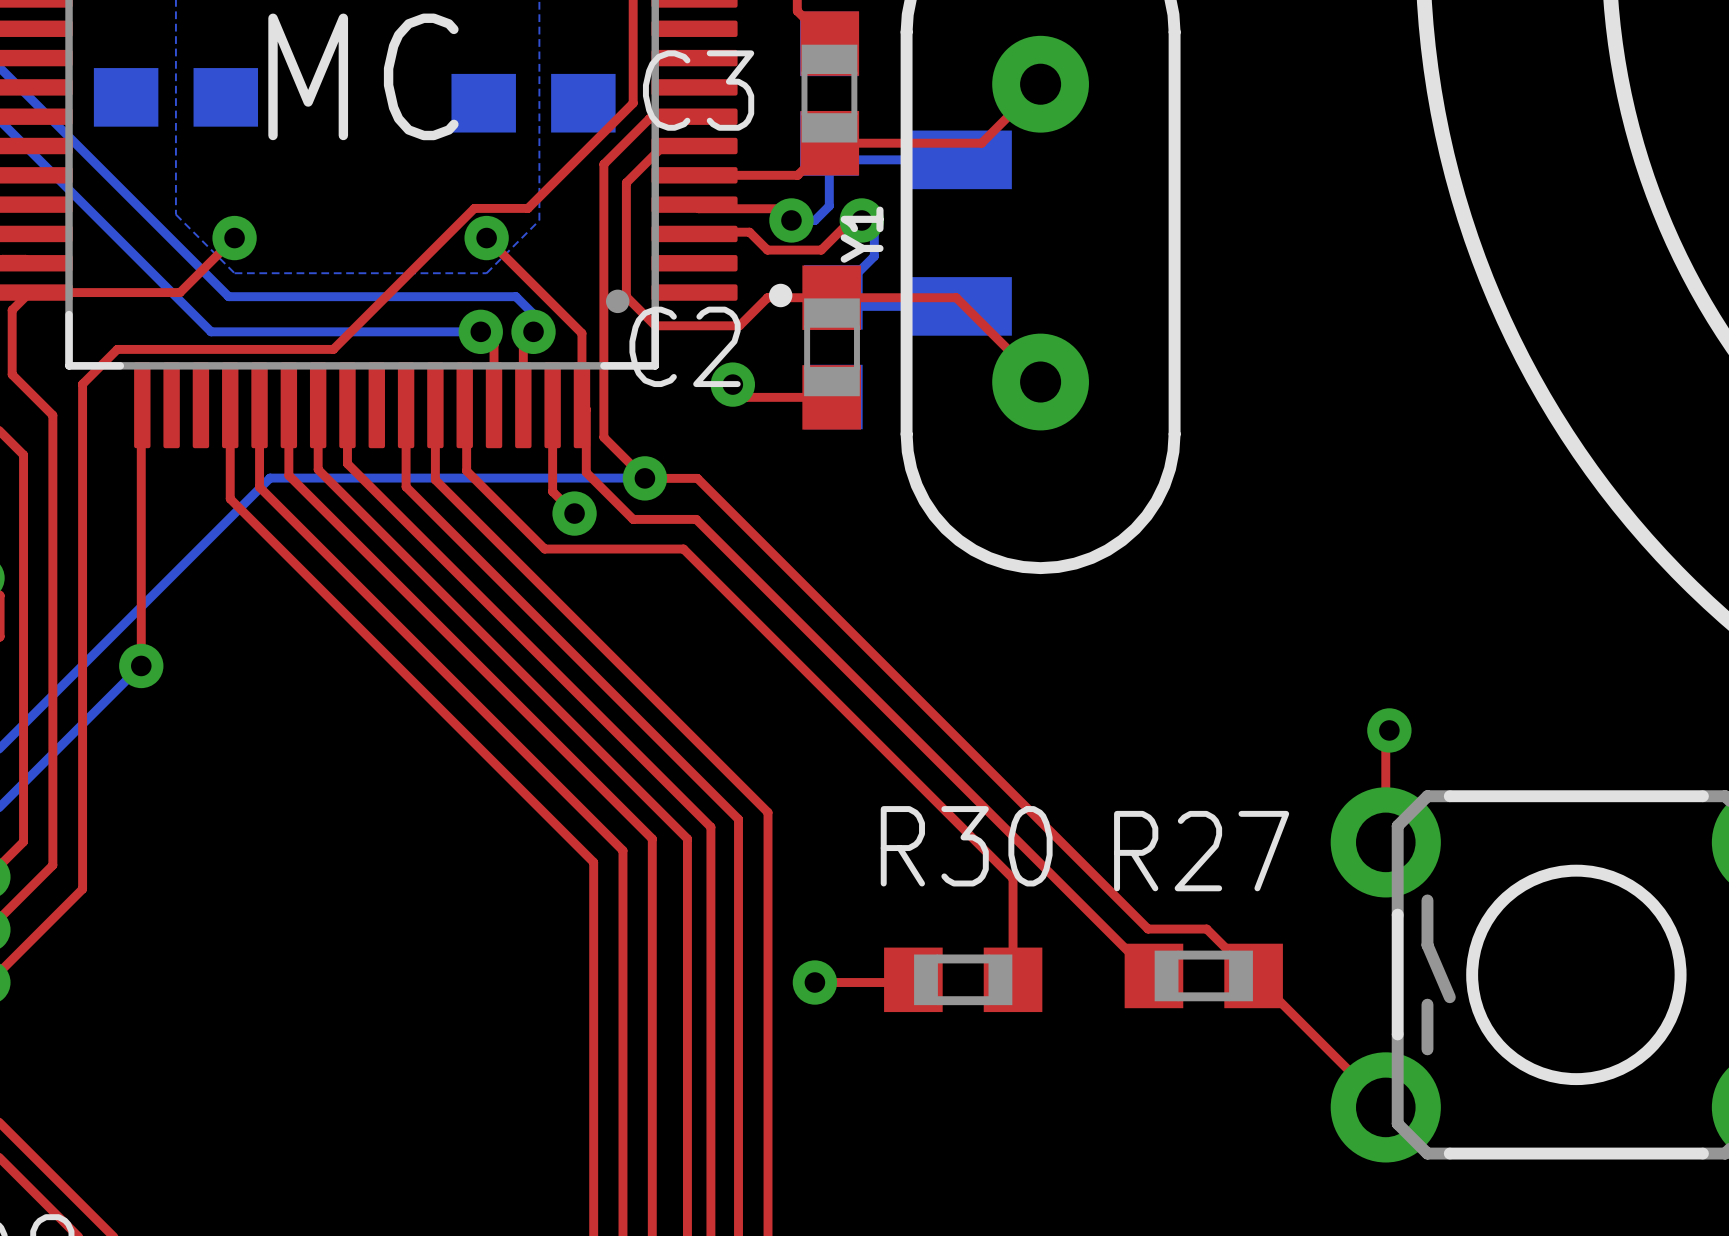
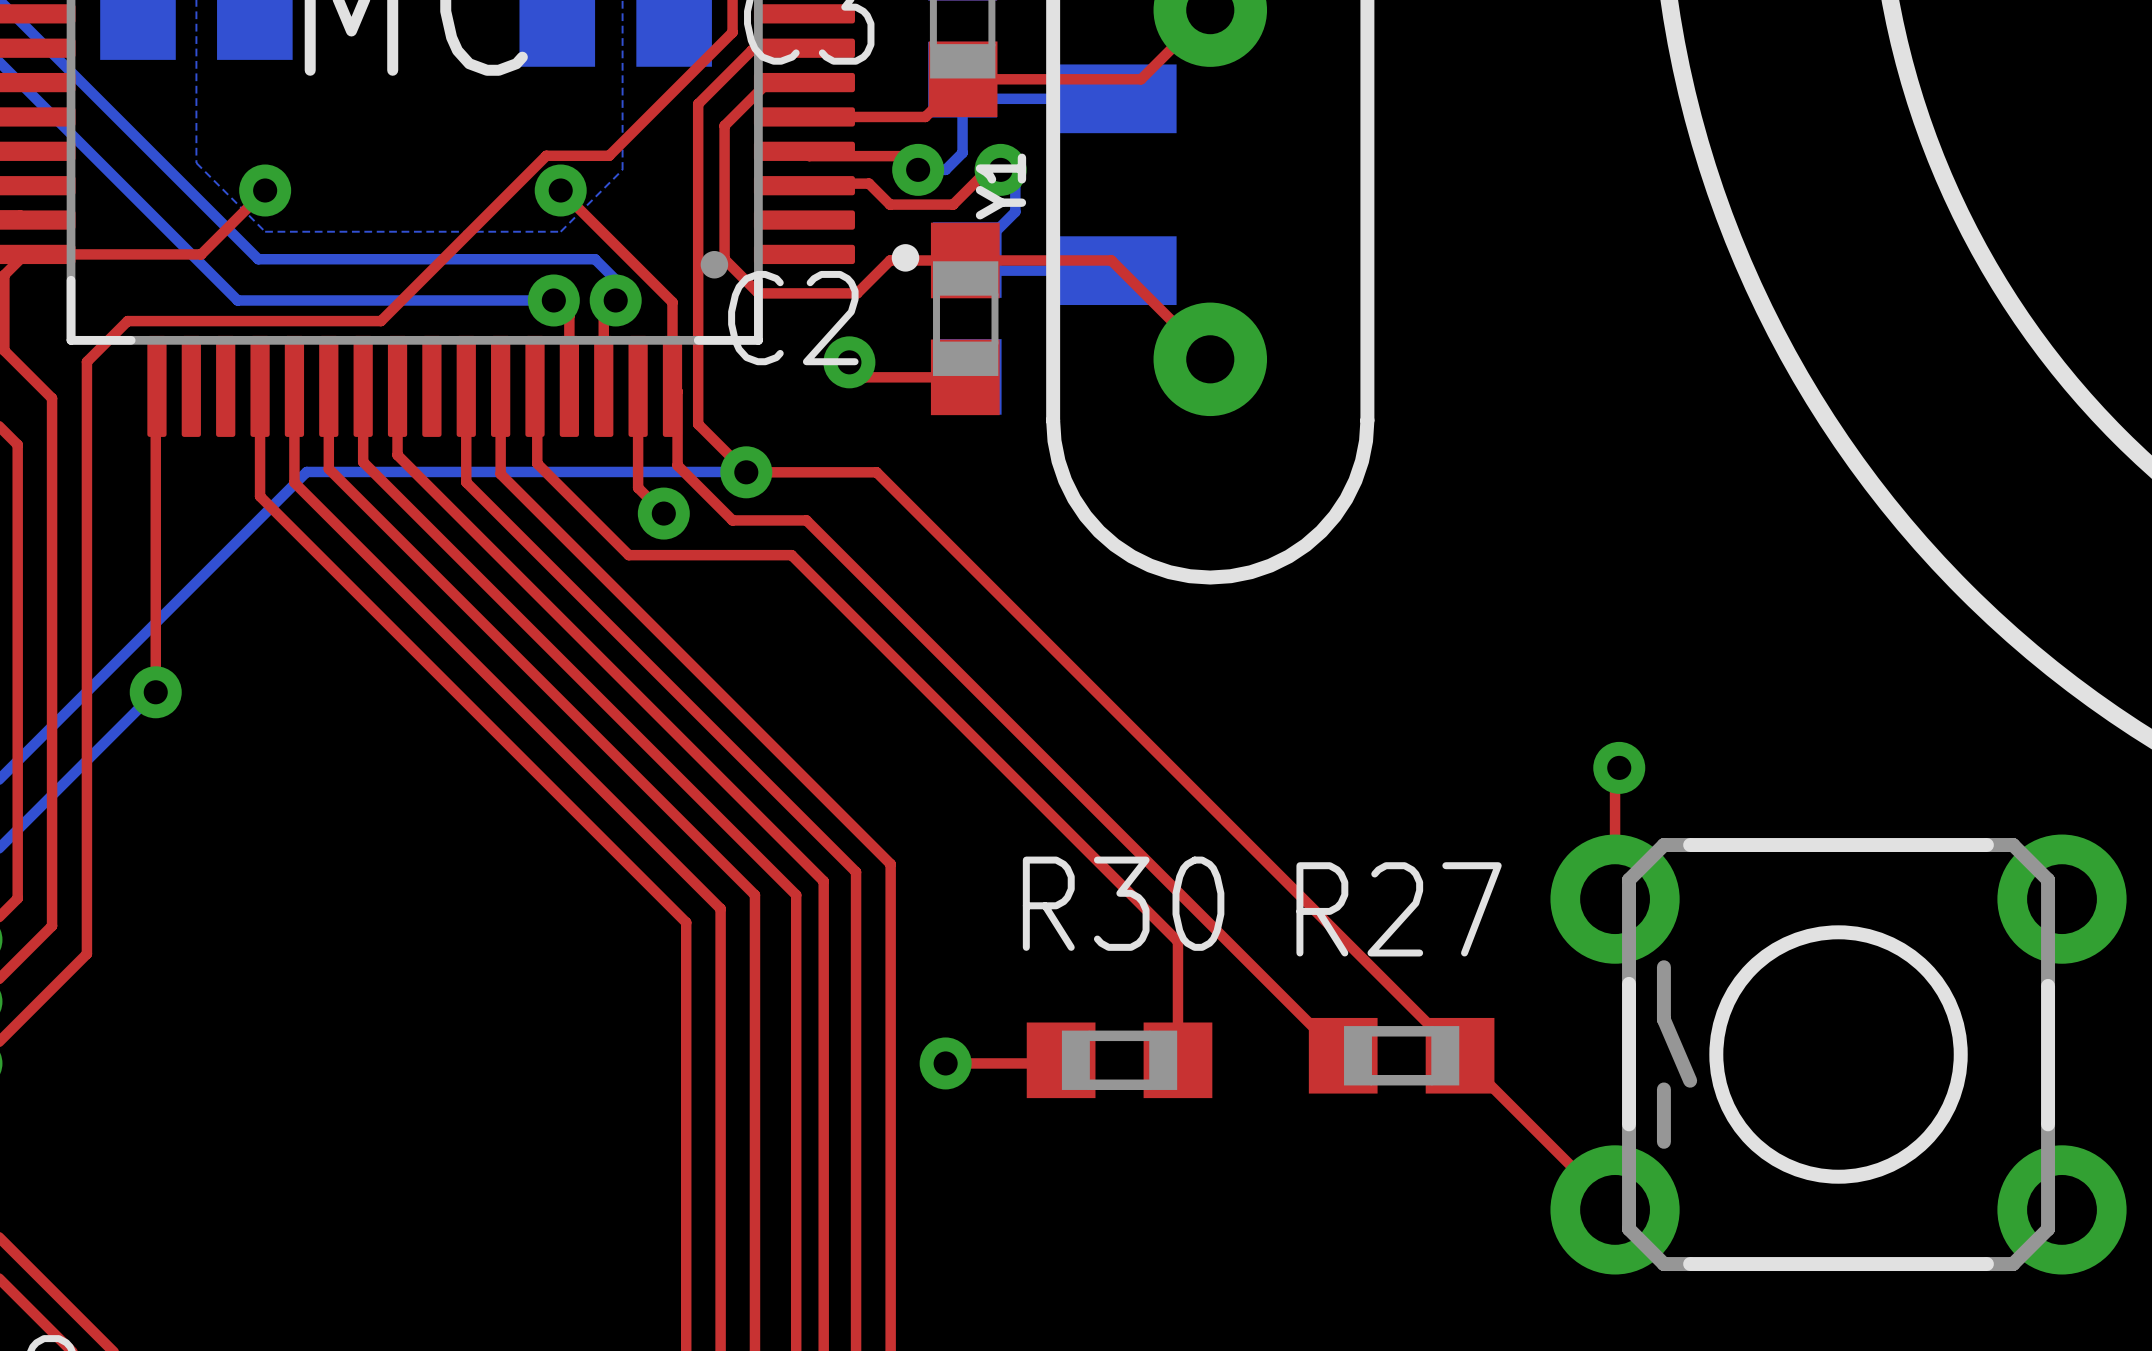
top track: (697, 478) (1148, 929) (1206, 929) -> (807, 472) (876, 472) (1405, 1000)

